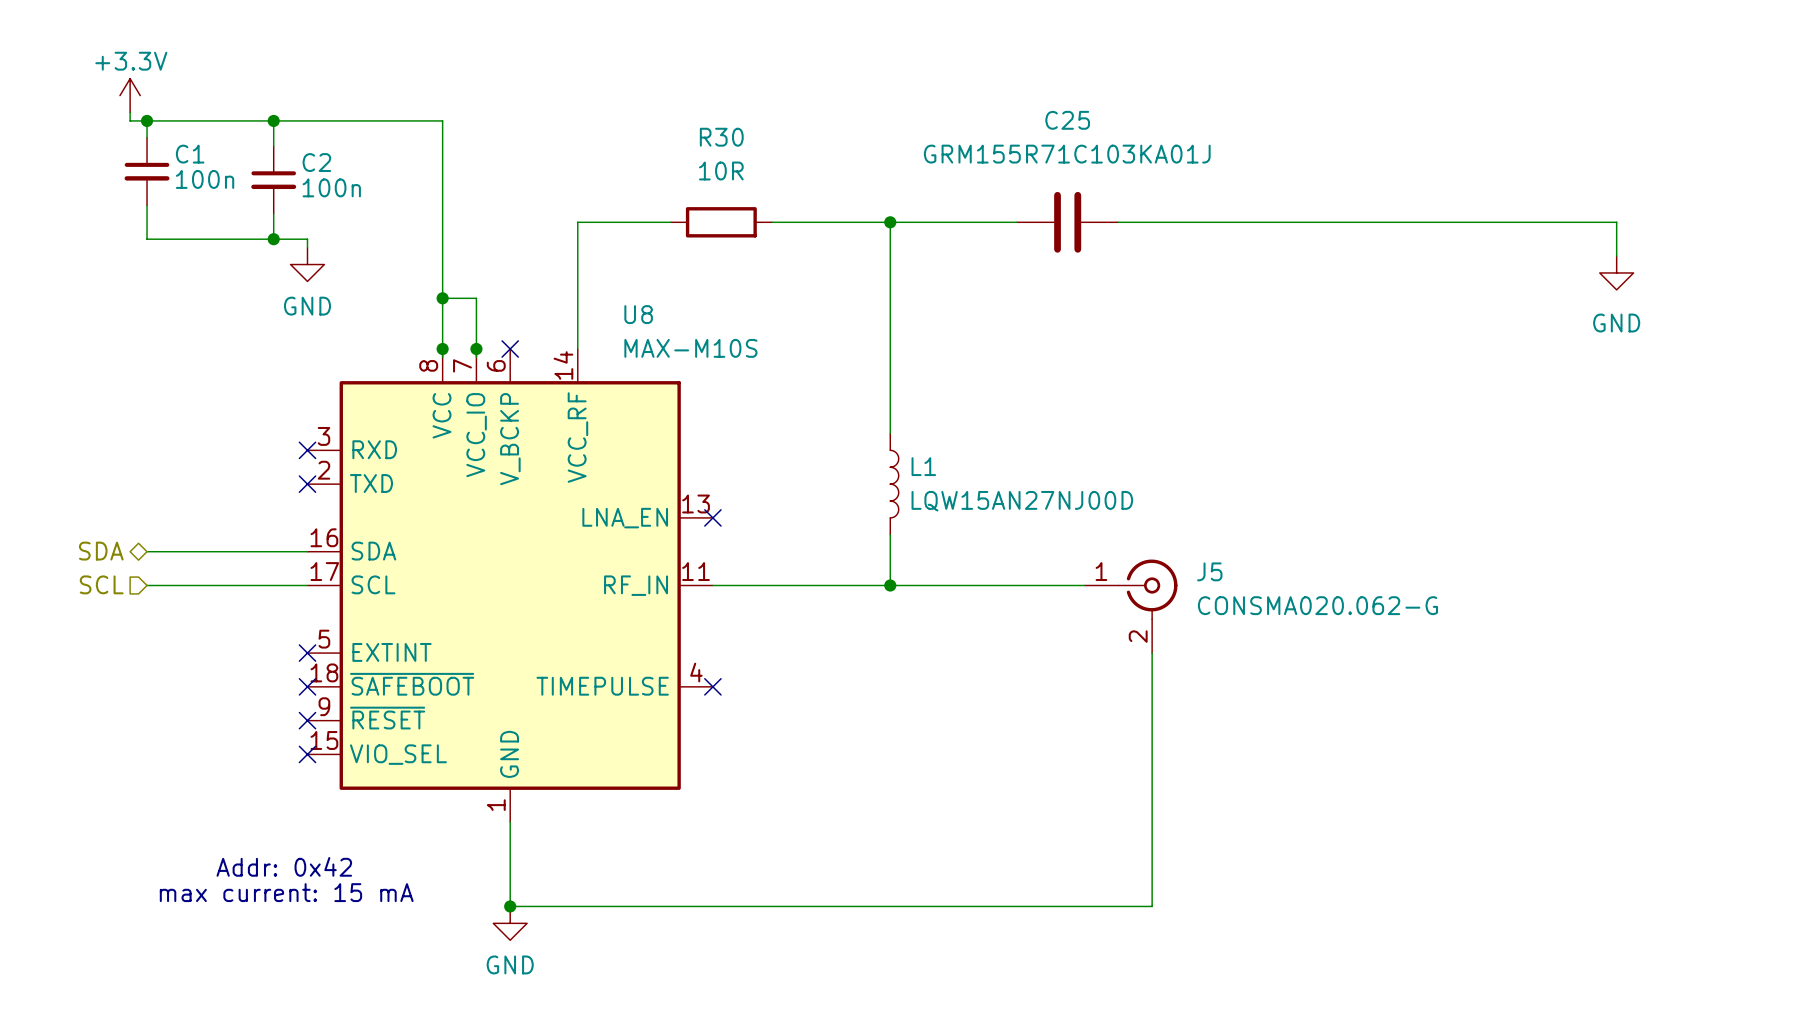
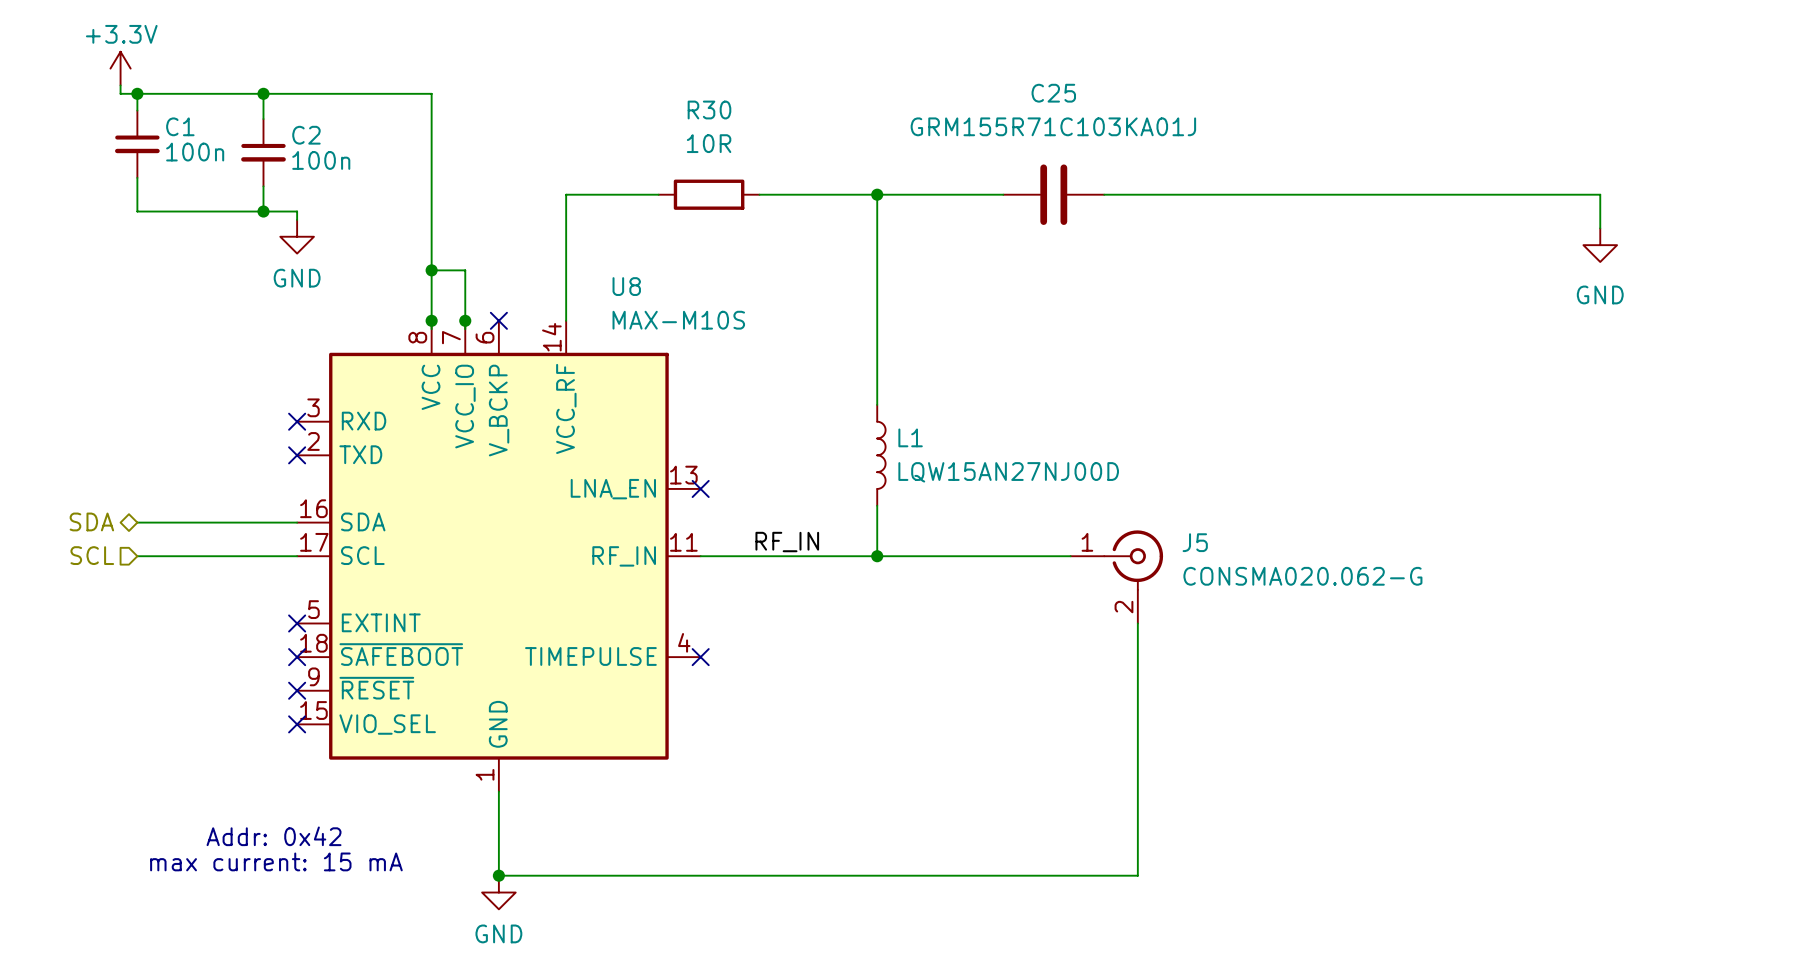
label: none -> RF_IN (787, 542)

